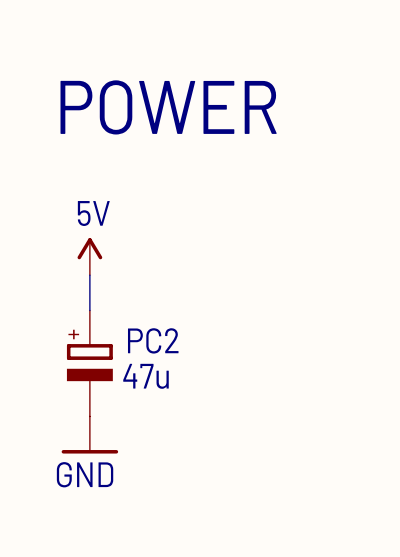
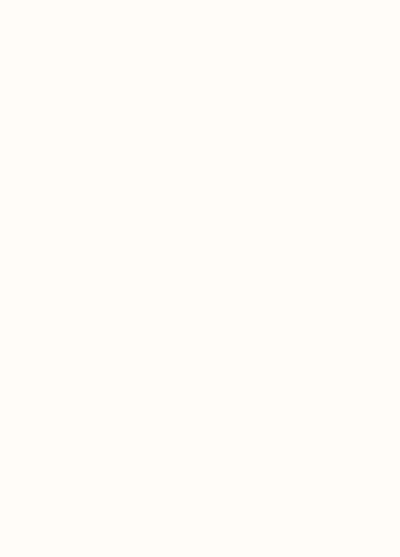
text: POWER (168, 107) -> none
power symbol: 5V (89, 256) -> none
wire: (89, 275) (89, 310) -> none
PC2: 47u (89, 363) -> none
power symbol: GND (89, 435) -> none

